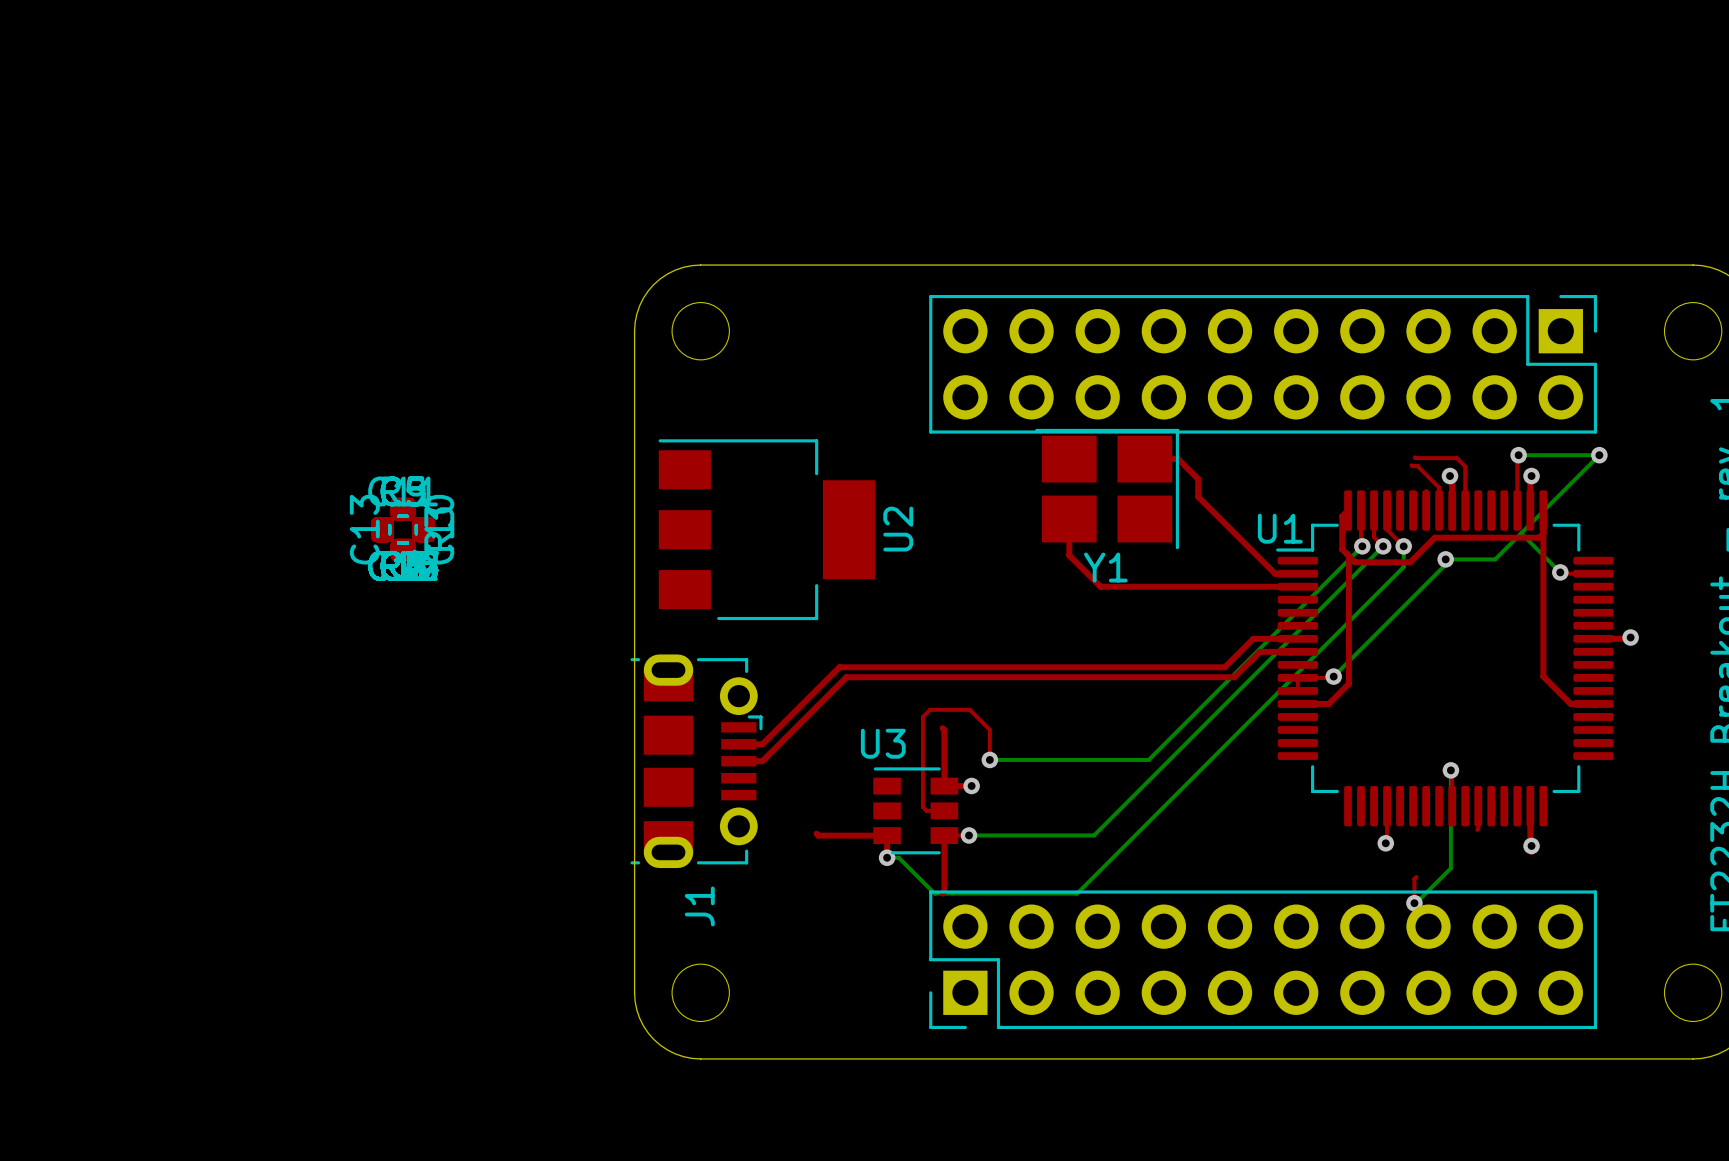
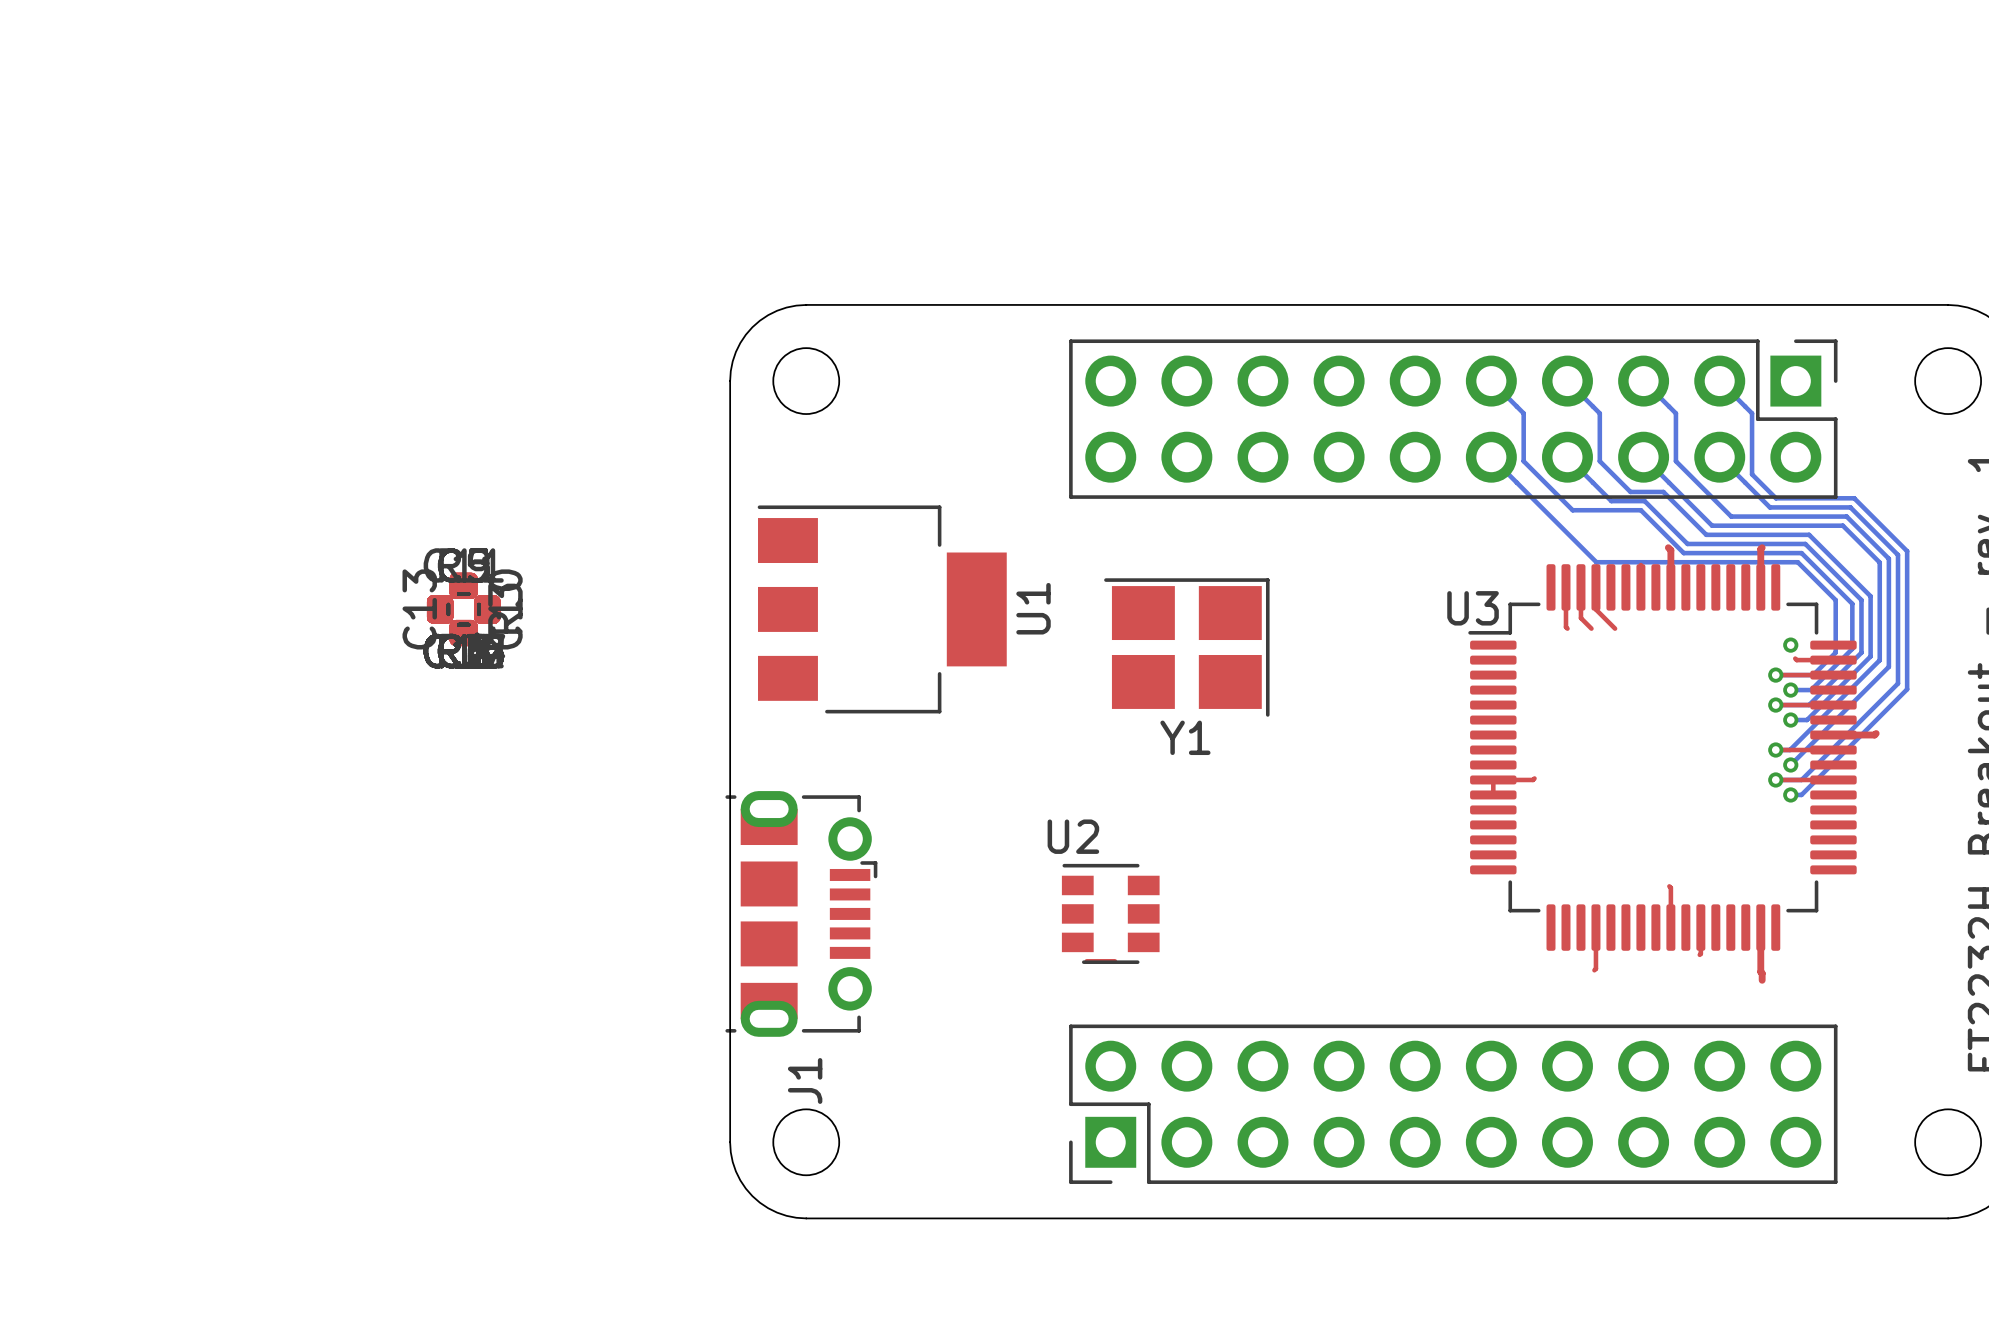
bottom track: none -> (1491, 381) (1523, 413) (1523, 461) (1572, 510) (1640, 510) (1683, 553) (1801, 553) (1852, 603) (1852, 648) (1811, 690) (1790, 690)
bottom track: none -> (1567, 381) (1599, 413) (1599, 461) (1630, 491) (1663, 491) (1706, 534) (1809, 534) (1870, 596) (1870, 656) (1807, 720) (1790, 720)
bottom track: none -> (1643, 381) (1675, 413) (1675, 461) (1731, 516) (1846, 516) (1888, 558) (1888, 666) (1790, 764)
bottom track: none -> (1719, 381) (1752, 413) (1752, 474) (1775, 498) (1854, 498) (1907, 551) (1907, 689) (1801, 794) (1790, 794)
bottom track: none -> (1491, 457) (1596, 562) (1797, 562) (1835, 600) (1835, 652) (1813, 675) (1775, 675)
bottom track: none -> (1567, 457) (1611, 501) (1644, 501) (1687, 543) (1805, 543) (1861, 600) (1861, 652) (1809, 705) (1775, 705)
bottom track: none -> (1643, 457) (1712, 525) (1842, 525) (1879, 562) (1879, 660) (1789, 750) (1775, 750)
bottom track: none -> (1719, 457) (1769, 507) (1850, 507) (1898, 554) (1898, 683) (1801, 779) (1775, 779)
top track: (1518, 455) (1517, 510) -> none
bottom track: (1518, 455) (1599, 455) (1495, 559) (1445, 559) (1445, 564) (1333, 676) -> none
via: (1518, 455) -> none
via: (1599, 455) -> none
top track: (1414, 457) (1456, 458) (1465, 466) (1465, 510) -> none
top track: (1140, 459) (1178, 459) (1198, 479) (1198, 496) (1275, 573) (1297, 573) -> none
top track: (1411, 465) (1417, 466) (1439, 487) (1439, 510) -> none
via: (1450, 476) -> none
via: (1531, 476) -> none
Y1 position: (1107, 489) -> (1186, 647)
top track: (1348, 510) (1342, 516) (1342, 549) (1355, 562) (1410, 562) (1434, 537) (1539, 537) (1543, 533) -> none
top track: (1543, 510) (1543, 676) (1570, 703) (1594, 705) -> none
top track: (1069, 519) (1069, 555) (1100, 586) (1297, 586) -> none
U1 name: U1 (1280, 528) -> U3 (1473, 608)
U2 name: U2 (898, 529) -> U1 (1033, 608)
bottom track: (1521, 533) (1560, 572) -> none
bottom track: (1362, 546) (1148, 759) (989, 759) -> none
via: (1362, 546) -> none
bottom track: (1383, 546) (1094, 835) (969, 835) -> none
via: (1383, 546) -> none
bottom track: (1403, 546) (1403, 567) (1077, 893) (934, 893) (898, 857) (887, 857) -> none
via: (1403, 546) -> none
top track: (1348, 556) (1348, 683) (1328, 703) (1297, 703) -> none
via: (1445, 559) -> none
via position: (1560, 572) -> (1790, 645)
top track: none -> (1775, 675) (1833, 675)
via: none -> (1775, 675)
via: none -> (1790, 690)
top track: none -> (1775, 705) (1833, 705)
via: none -> (1775, 705)
via: none -> (1790, 720)
via: (1630, 637) -> none
top track: (1297, 638) (1253, 638) (1224, 667) (839, 667) (762, 744) (738, 744) -> none
top track: (1297, 651) (1259, 651) (1234, 677) (846, 677) (762, 761) (738, 761) -> none
top track: none -> (1775, 750) (1833, 750)
via: none -> (1775, 750)
via: none -> (1790, 764)
via: (1333, 676) -> none
top track: none -> (1775, 779) (1833, 779)
via: none -> (1775, 779)
via: none -> (1790, 794)
top track: (942, 728) (944, 729) (944, 786) (971, 786) -> none
top track: (989, 759) (989, 729) (969, 709) (930, 709) (922, 716) (922, 807) (926, 810) (944, 810) -> none
via: (989, 759) -> none
J1 position: (696, 761) -> (801, 913)
bottom track: (1450, 770) (1450, 868) (1414, 903) -> none
via: (1450, 770) -> none
via: (971, 785) -> none
U2: none -> (1110, 913)
U3: (915, 810) -> none
top track: (816, 833) (818, 835) (887, 835) (887, 857) -> none
top track: (944, 835) (944, 891) (942, 893) -> none
via: (969, 835) -> none
via: (1385, 843) -> none
via: (1531, 845) -> none
via: (887, 857) -> none
top track: (1416, 877) (1414, 878) (1414, 903) -> none
via: (1414, 903) -> none

